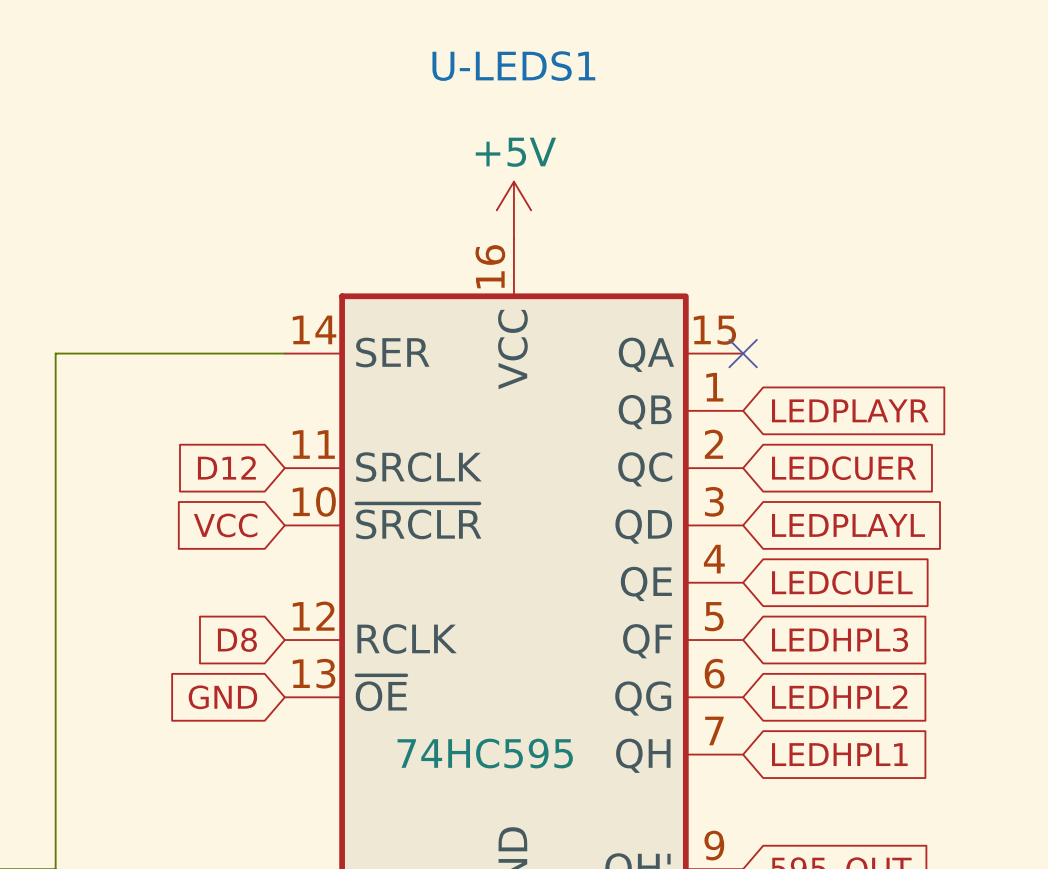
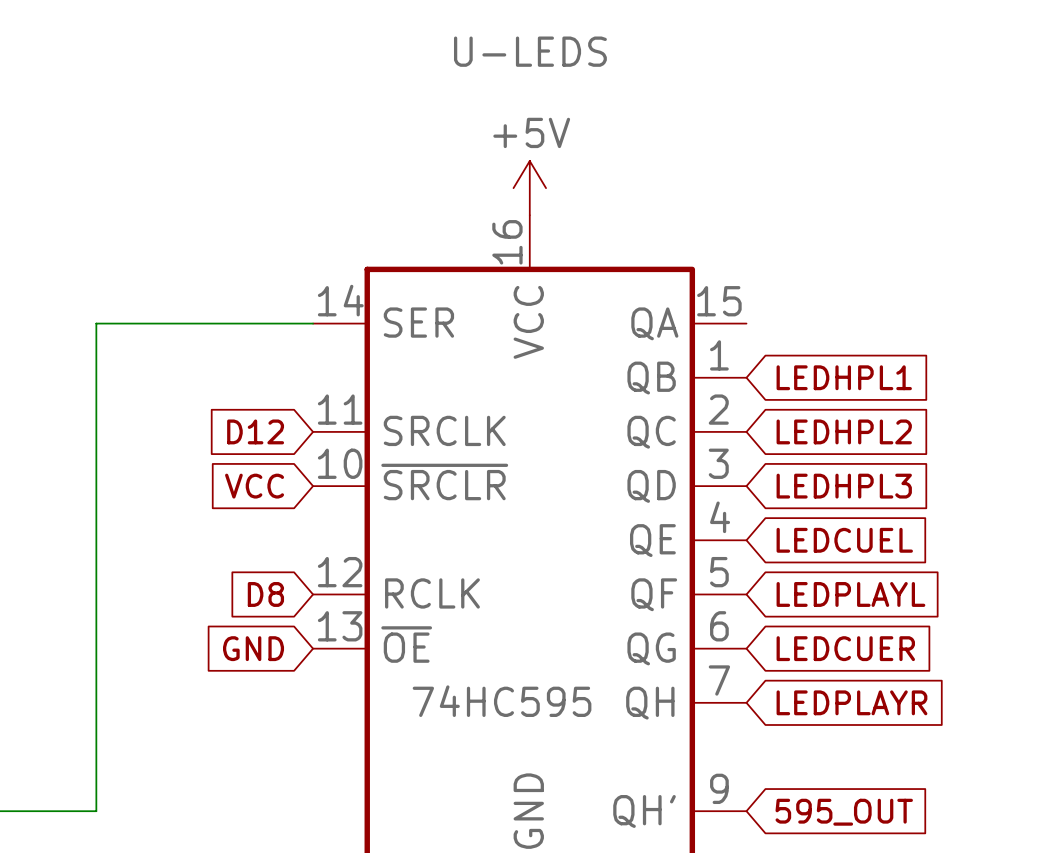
U-LEDS1 name: U-LEDS1 (513, 66) -> U-LEDS (530, 51)
no-connect mark: (743, 353) -> none
global label: LEDPLAYR (850, 410) -> LEDHPL1 (844, 377)
global label: LEDCUER (844, 468) -> LEDHPL2 (844, 431)
global label: LEDPLAYL (848, 525) -> LEDHPL3 (844, 486)
global label: LEDHPL3 (840, 640) -> LEDPLAYL (850, 594)
global label: LEDHPL2 (839, 697) -> LEDCUER (845, 648)
global label: LEDHPL1 (839, 754) -> LEDPLAYR (851, 702)

